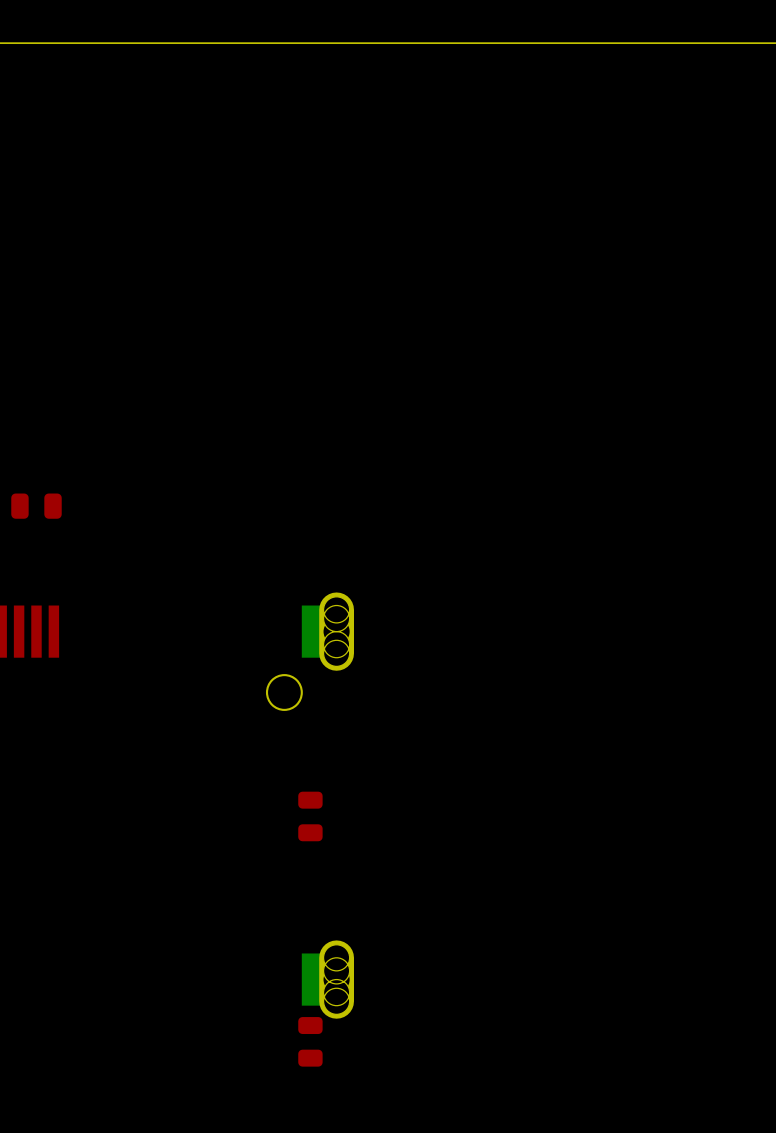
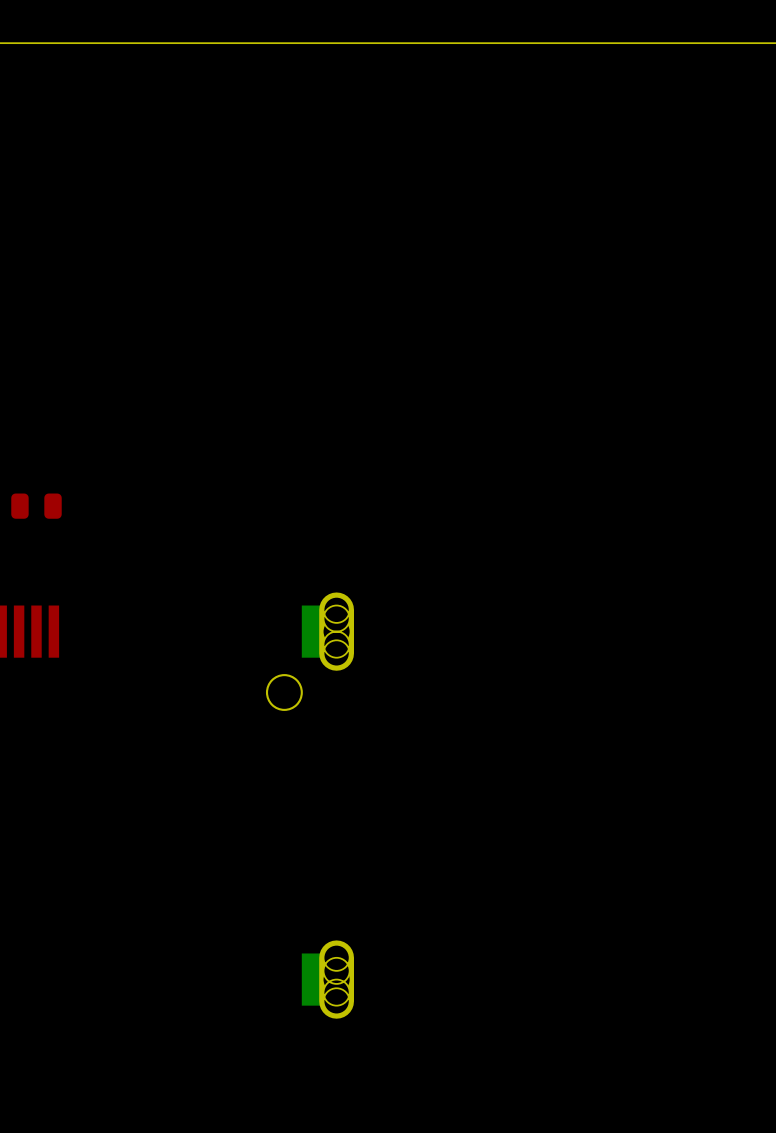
part: (310, 816) -> none
part: (310, 1041) -> none

